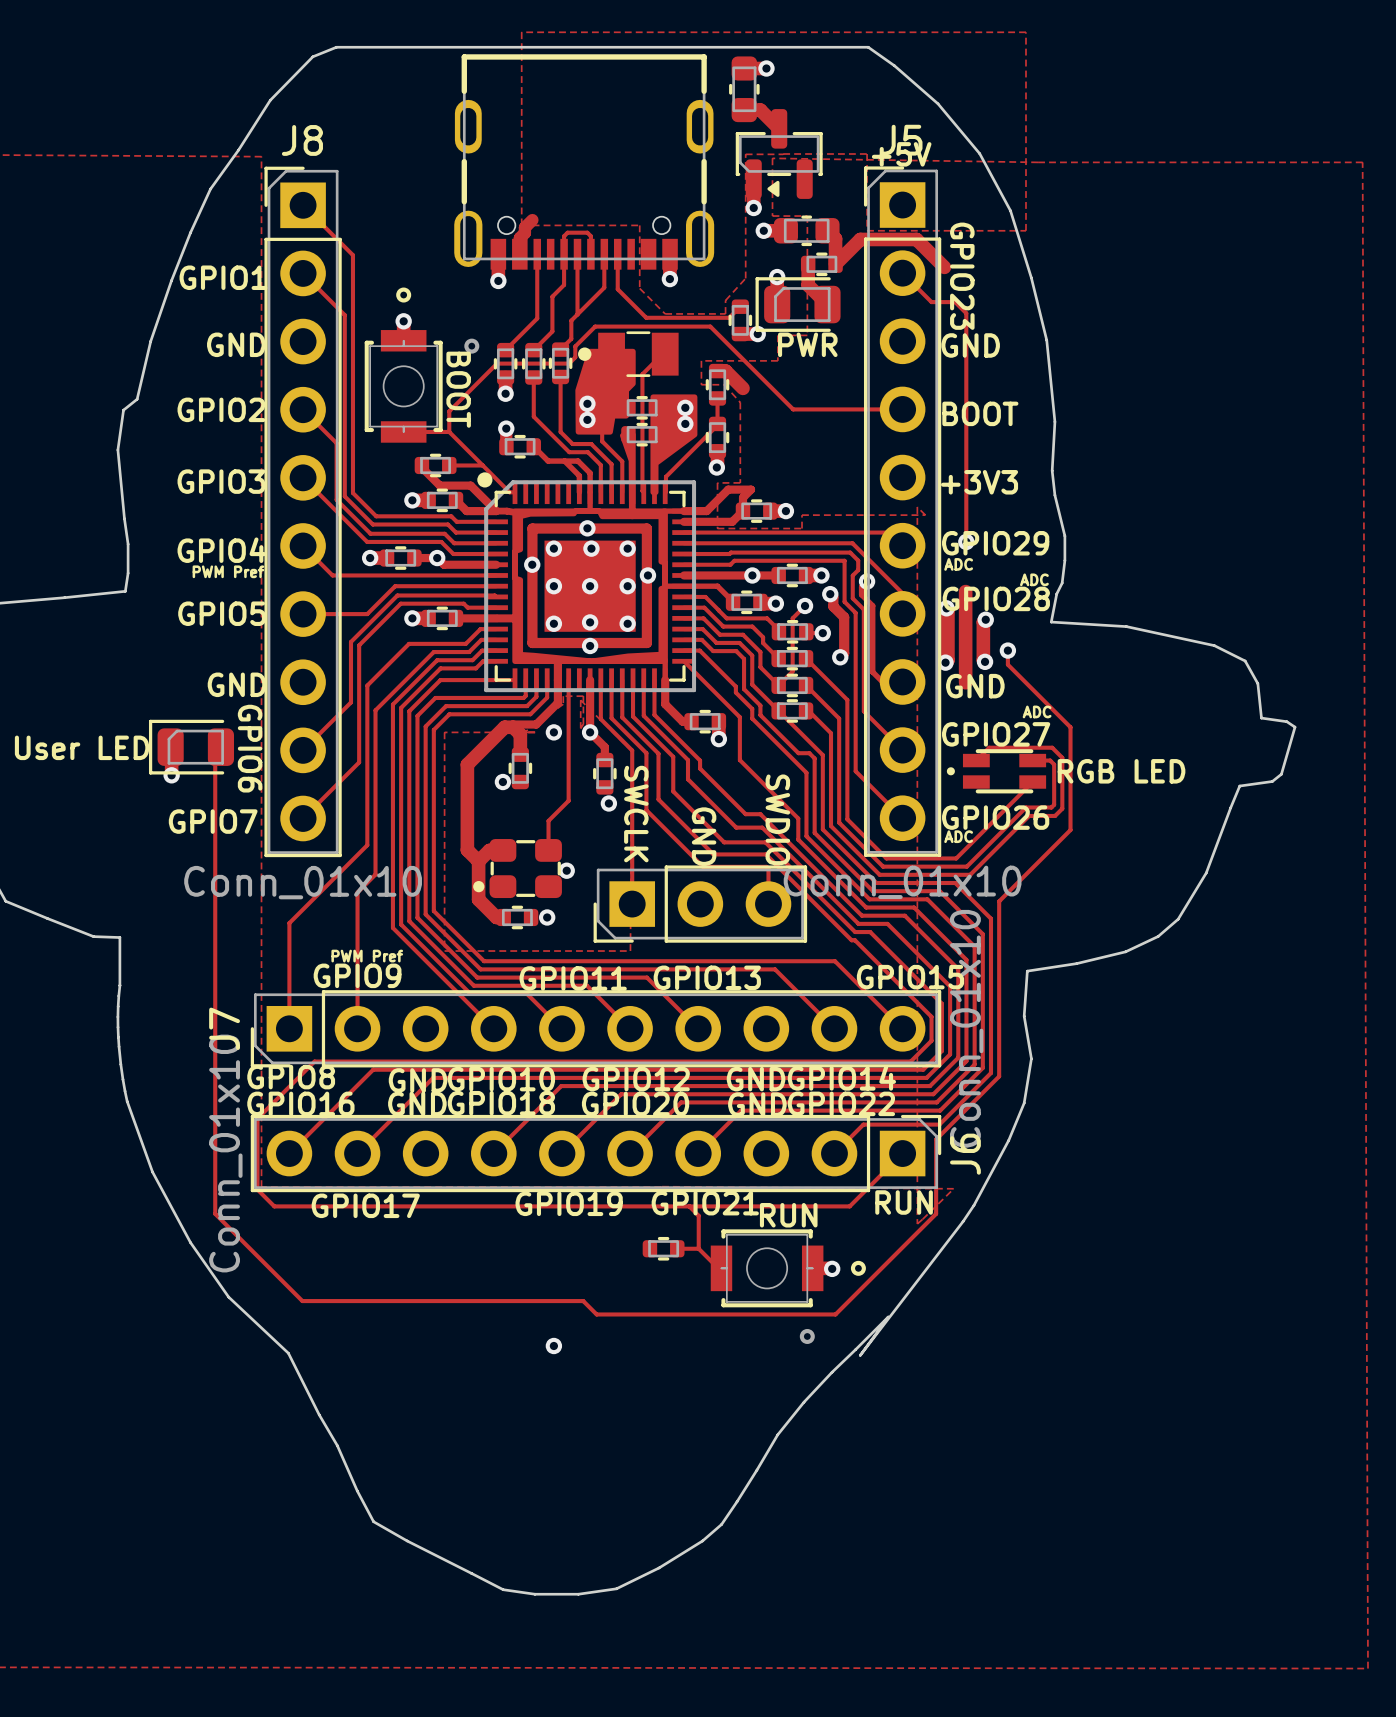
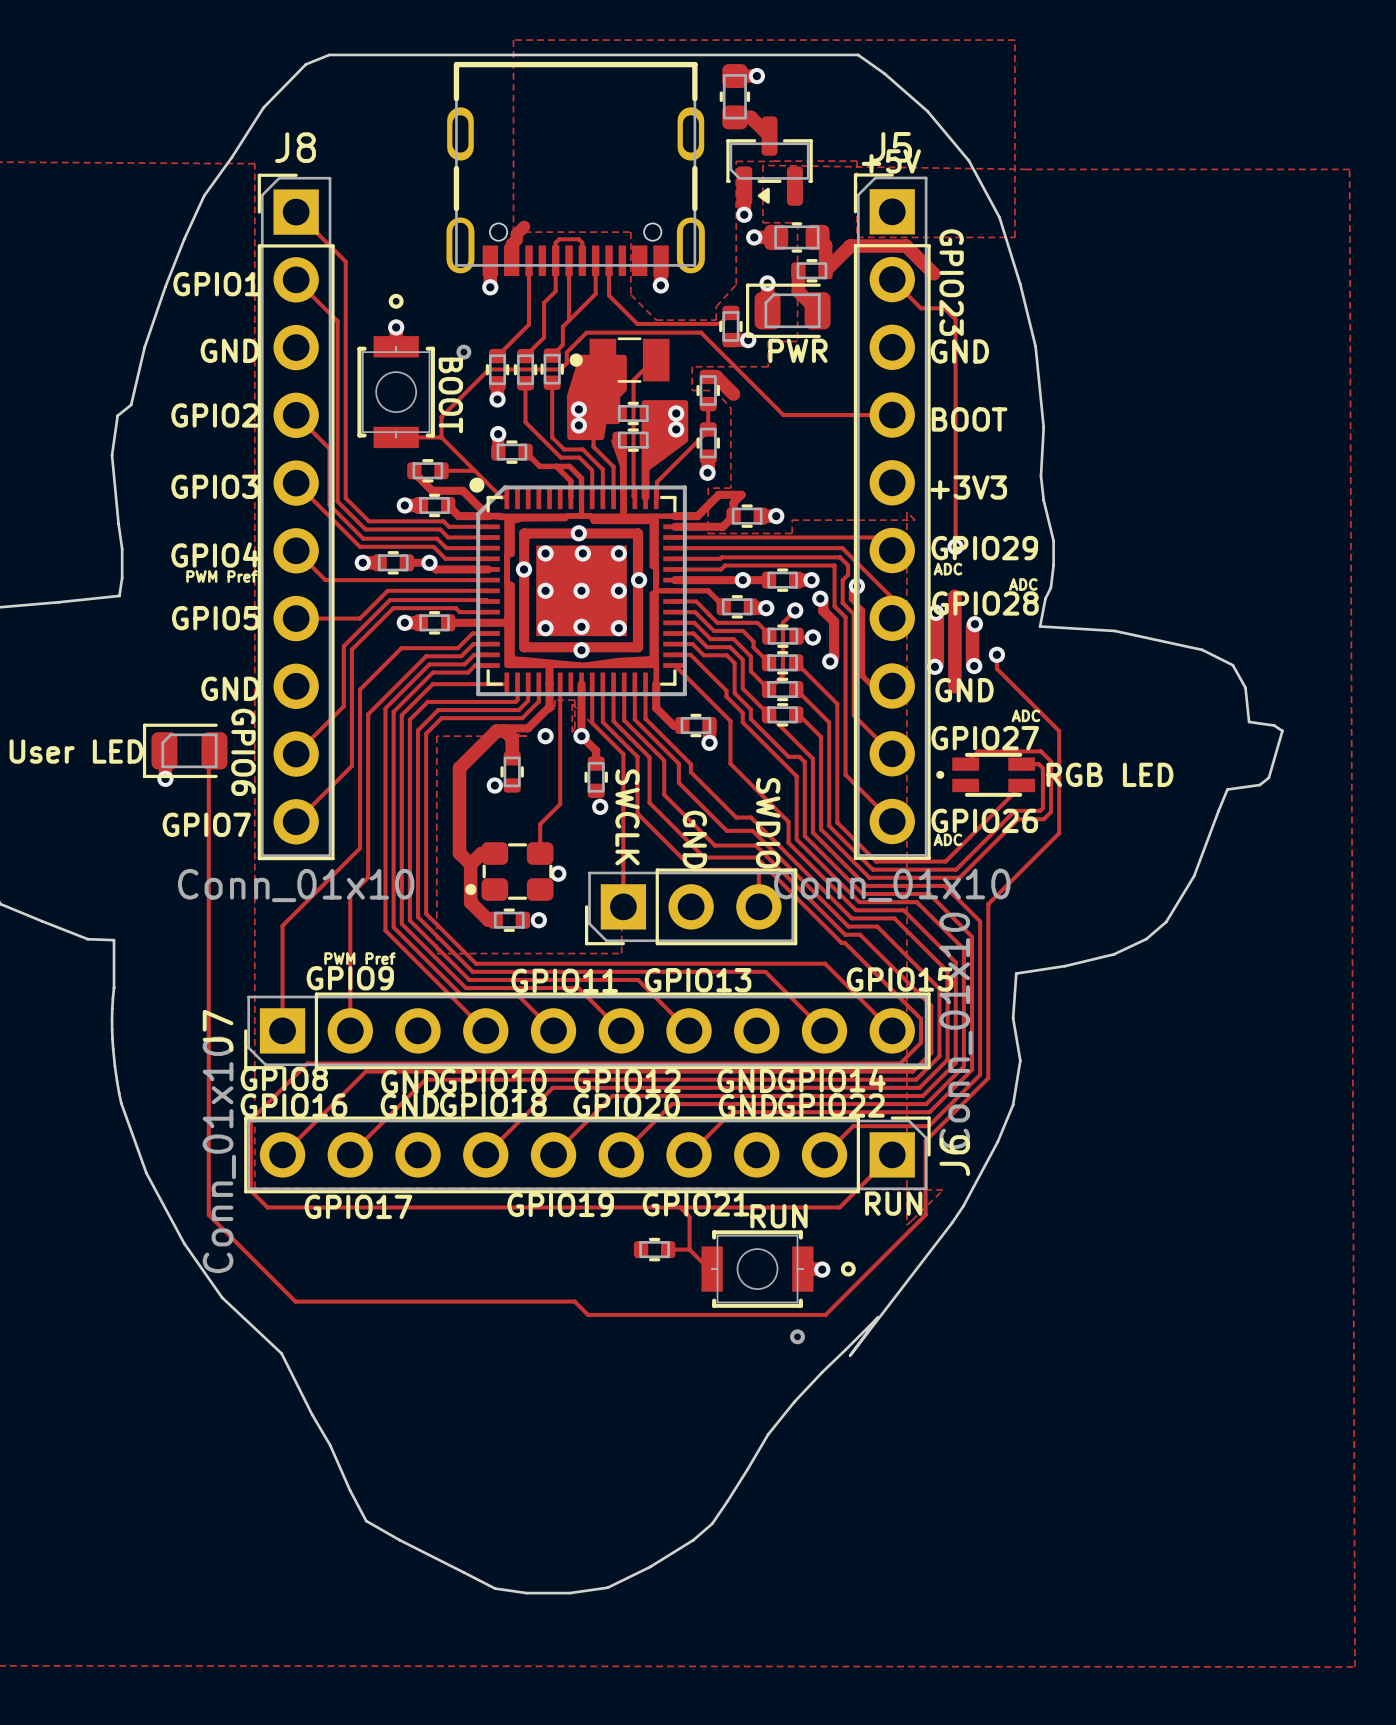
via: (553, 1345) -> none

